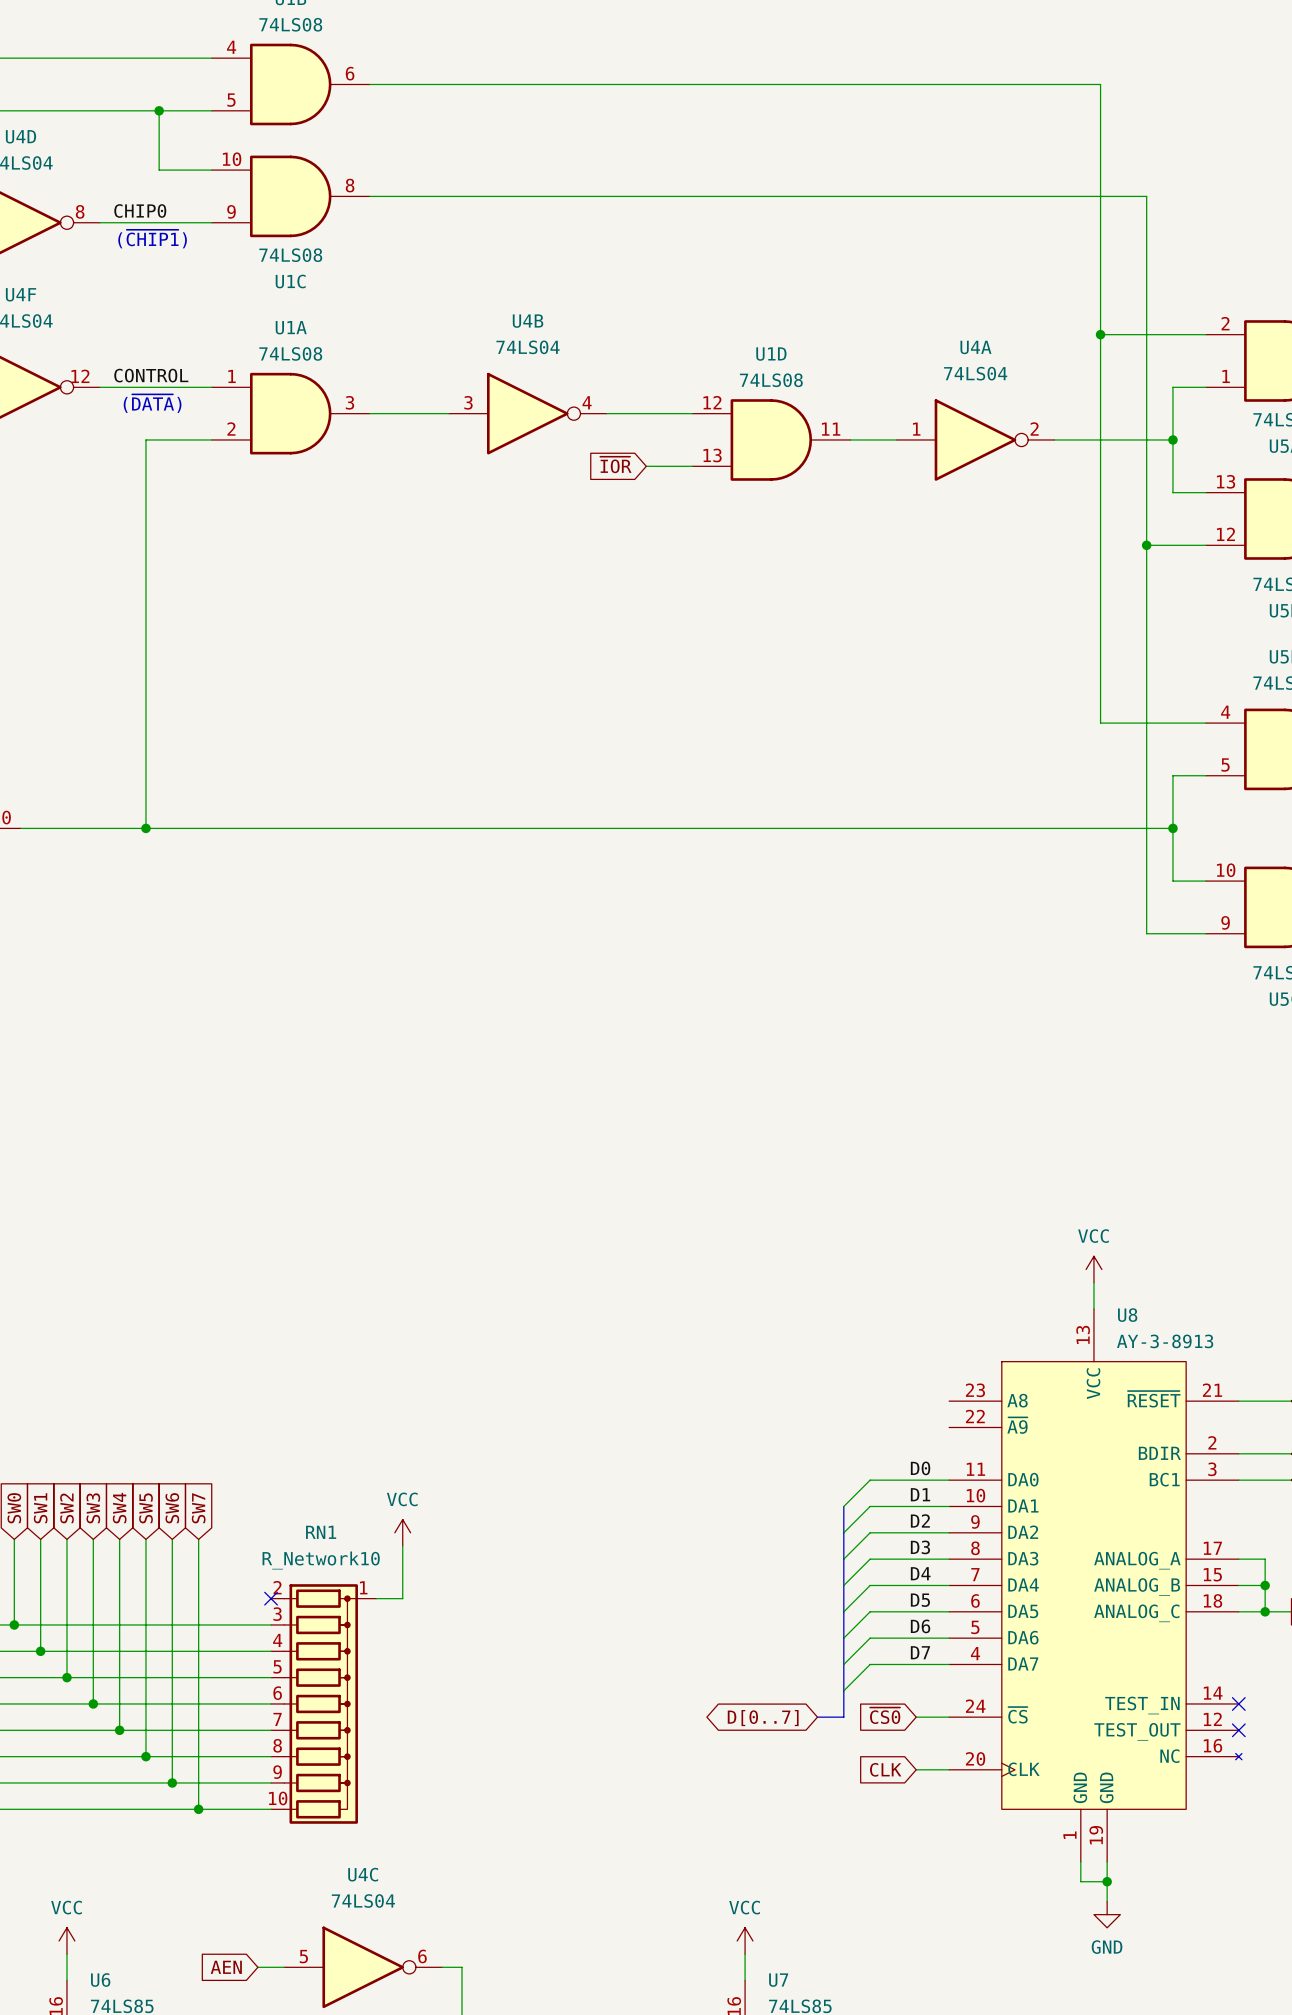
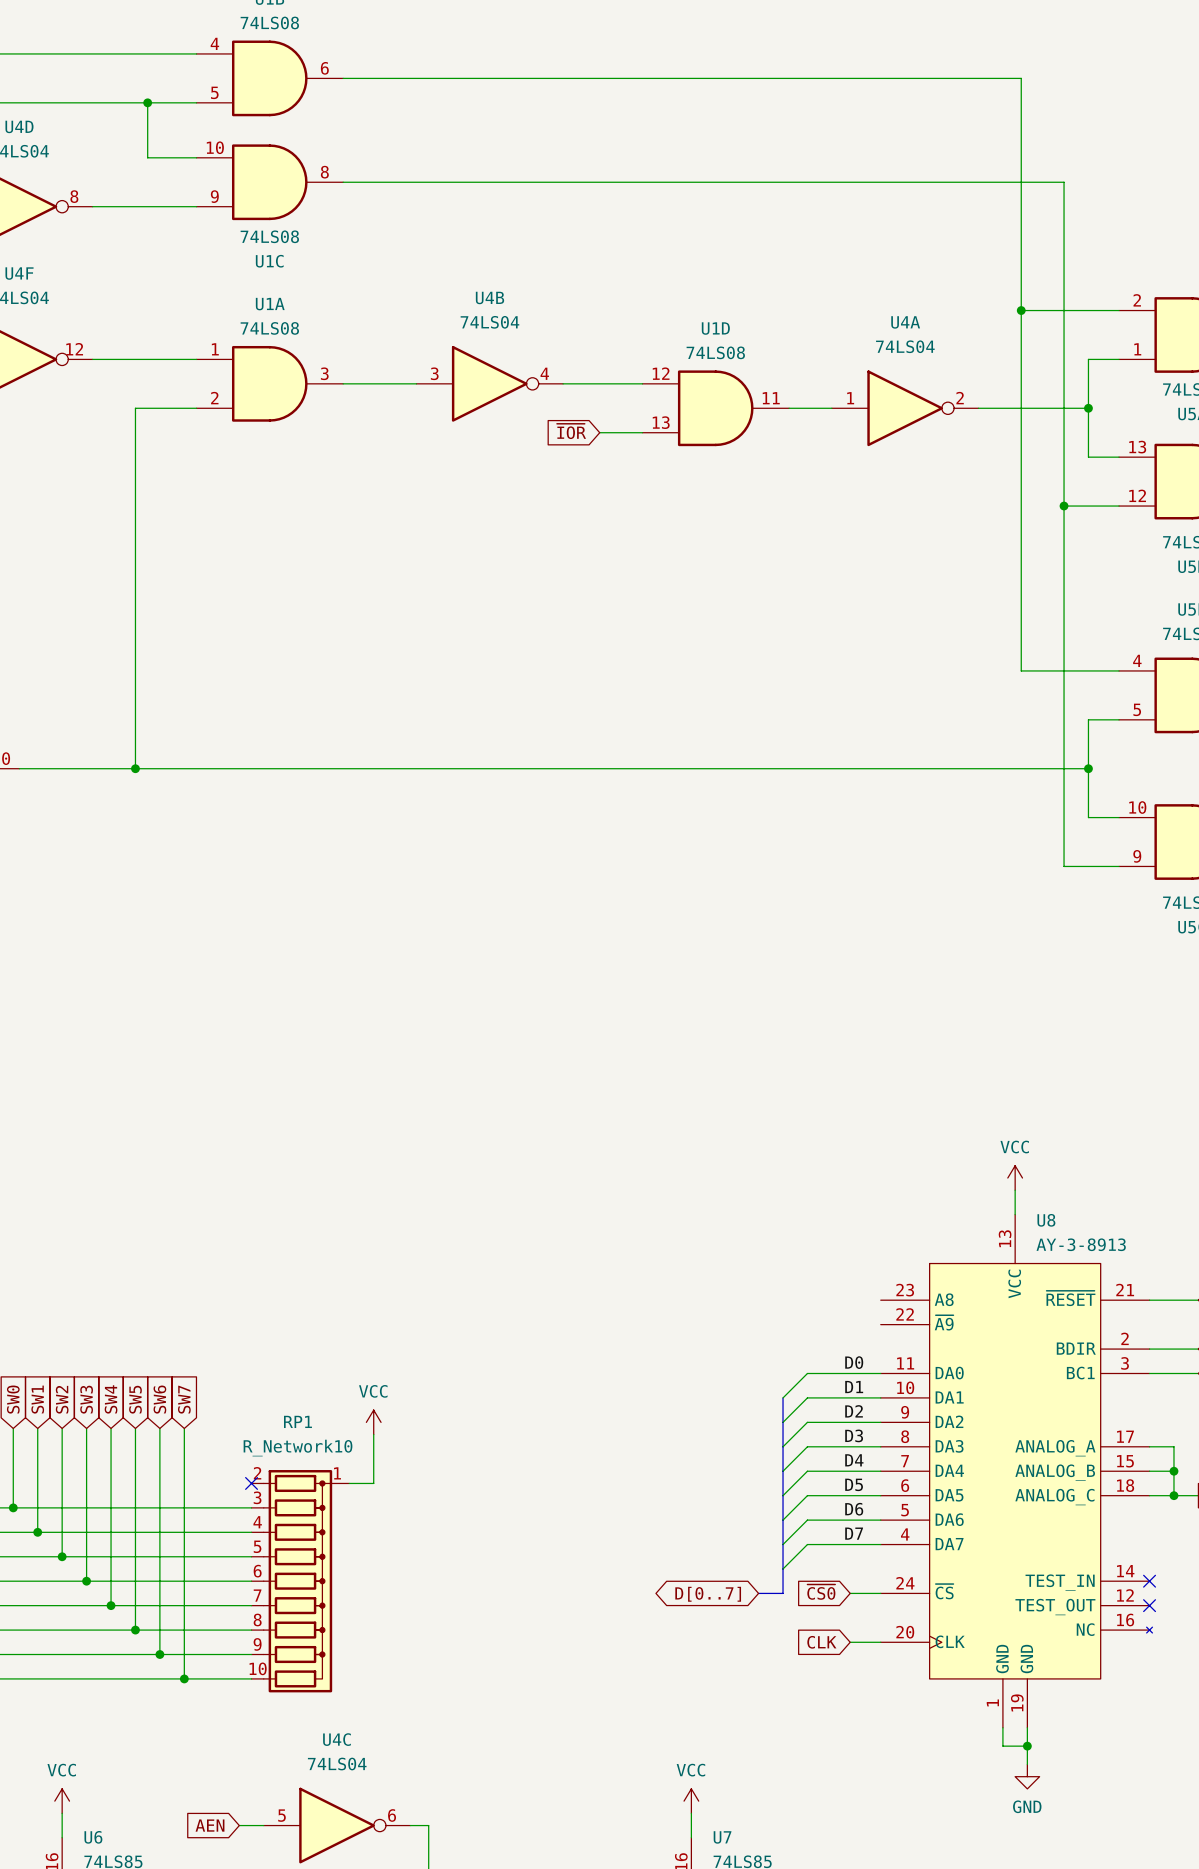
label: CHIP0 (140, 211) -> none
text: (~{CHIP1}) (152, 239) -> none
label: CONTROL (151, 375) -> none
text: (~{DATA}) (152, 403) -> none
RN1 name: RN1 (321, 1532) -> RP1 (297, 1421)

